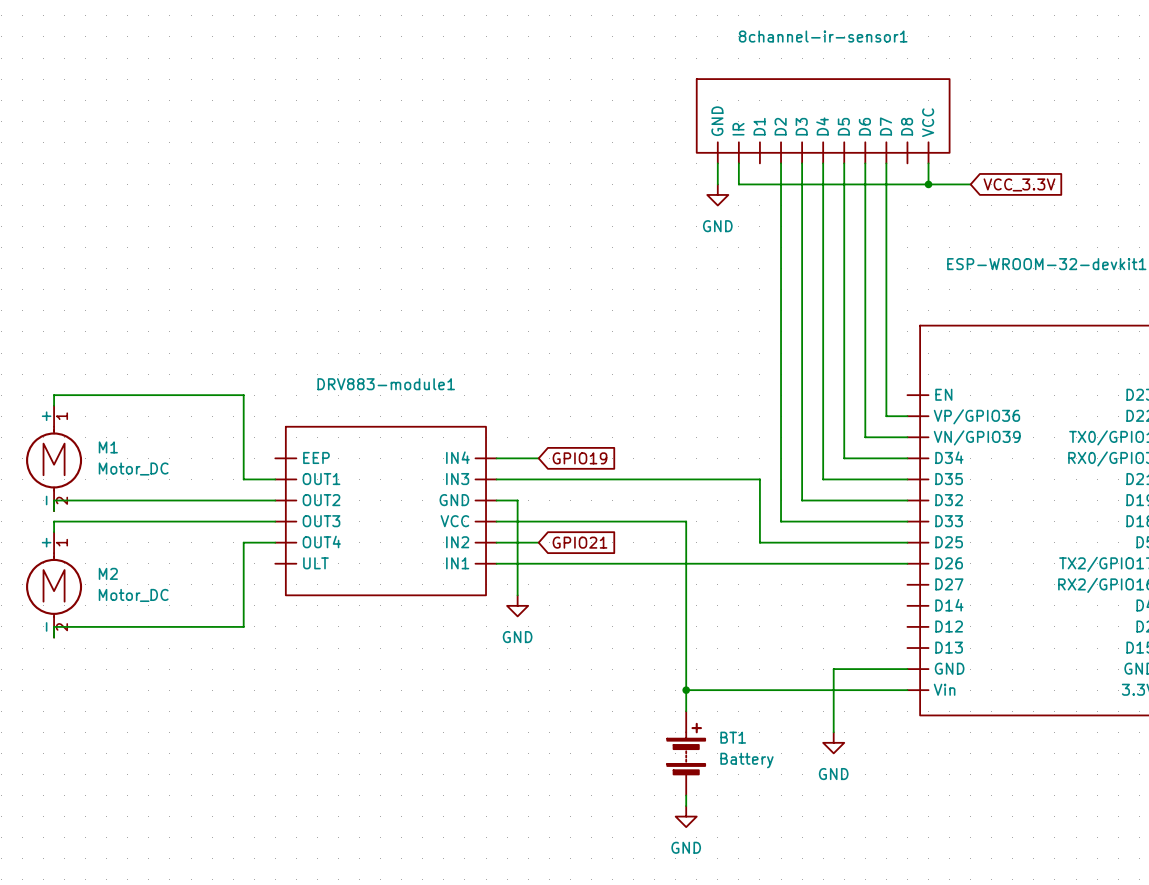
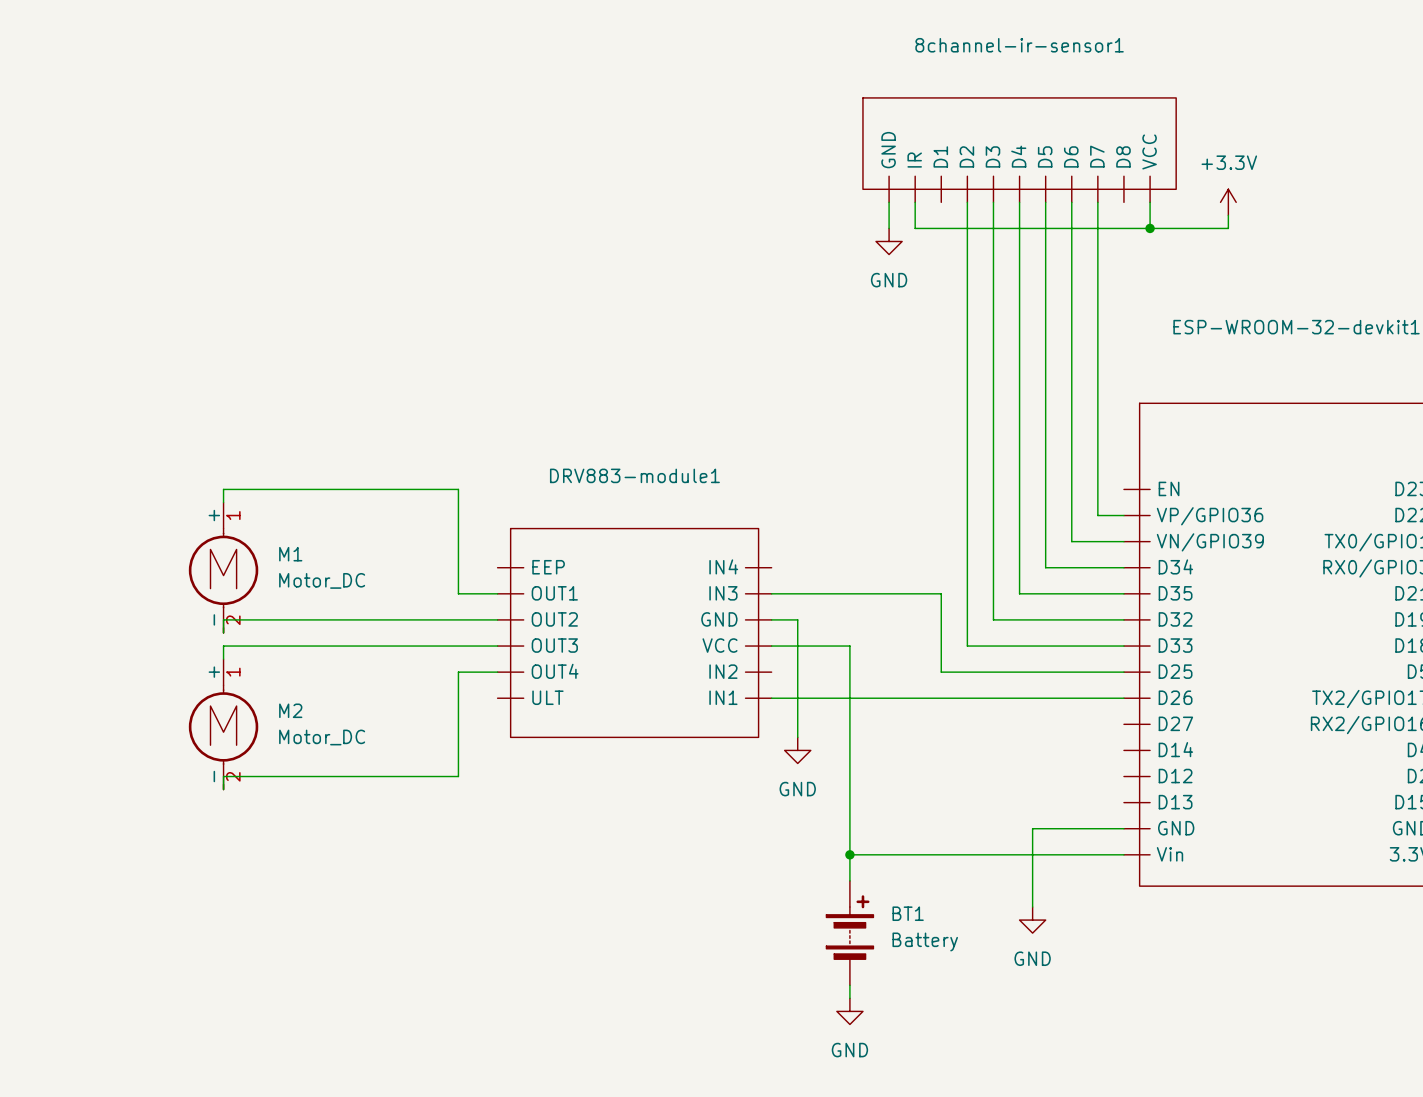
power symbol: none -> +3.3V (1228, 202)
wire: none -> (1228, 215) (1228, 228) (1202, 228)
global label: VCC_3.3V (1019, 184) -> none
wire: (180, 395) (54, 395) (54, 405) -> (223, 489) (223, 502)
wire: (243, 395) (243, 479) (275, 479) -> (301, 489) (458, 489) (458, 593) (497, 593)
M1 position: (54, 458) -> (223, 567)
wire: (496, 458) (538, 458) -> none
global label: GPIO19 (579, 458) -> none
wire: (496, 479) (622, 479) -> none
wire: (180, 500) (54, 500) (54, 511) -> (223, 619) (223, 632)
wire: none -> (340, 619) (497, 619)
wire: (496, 500) (517, 500) (517, 595) -> (771, 619) (797, 619) (797, 737)
DRV883-module1 position: (385, 511) -> (634, 632)
wire: (180, 521) (54, 521) (54, 532) -> (223, 646) (223, 659)
wire: none -> (340, 646) (497, 646)
wire: (496, 521) (622, 521) -> none
wire: (275, 542) (243, 542) (243, 626) -> (497, 672) (458, 672) (458, 776) (301, 776)
wire: (496, 542) (538, 542) -> none
global label: GPIO21 (579, 542) -> none
wire: (496, 563) (622, 563) -> none
M2 position: (54, 584) -> (223, 724)
power symbol position: GND (517, 605) -> GND (797, 750)
wire: (180, 626) (54, 626) (54, 637) -> (223, 776) (223, 789)

